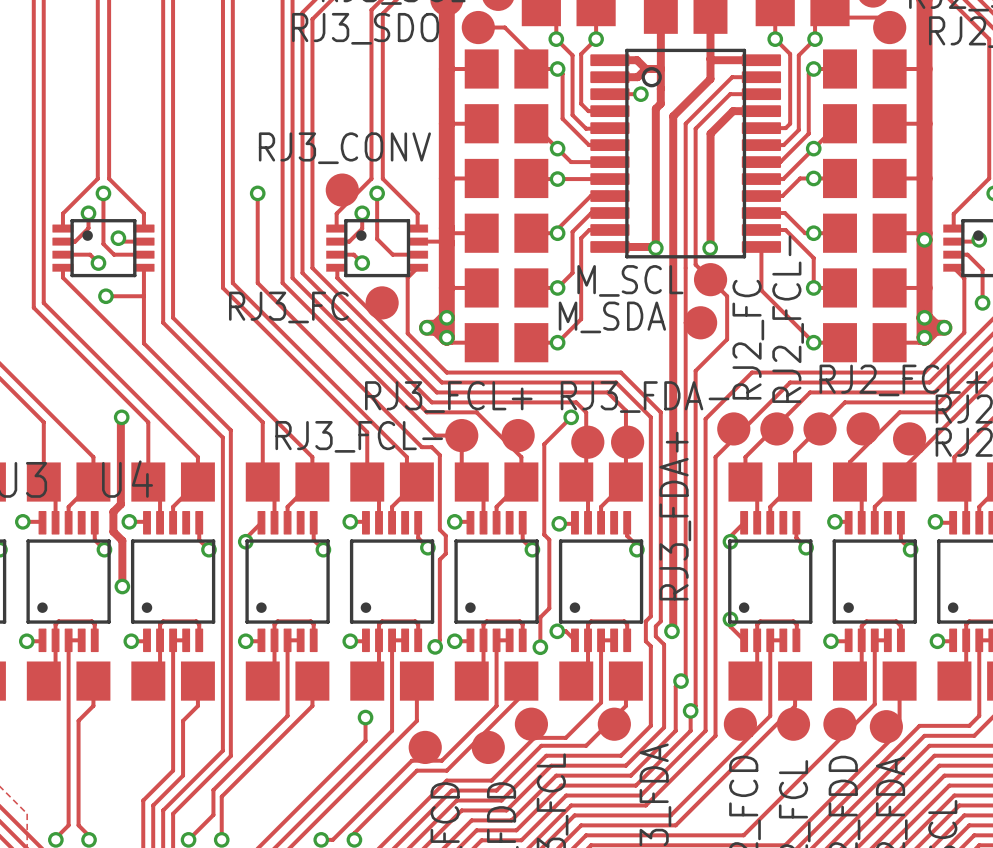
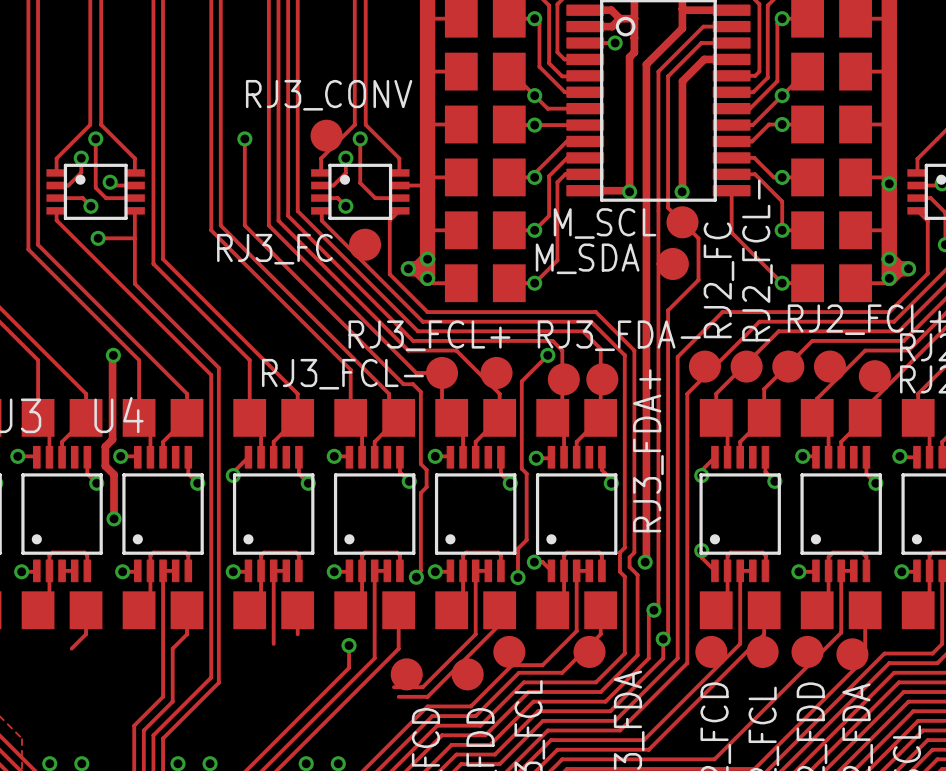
track: (68, 640) (68, 825) (55, 839) -> none
track: (312, 705) (221, 796) (221, 839) -> none
track: (287, 715) (213, 790) (213, 814) (188, 839) -> none
track: (78, 720) (78, 825) (89, 835) (89, 839) -> none
track: (411, 760) (332, 839) (321, 839) -> none
track: (416, 770) (354, 833) (354, 839) -> none

